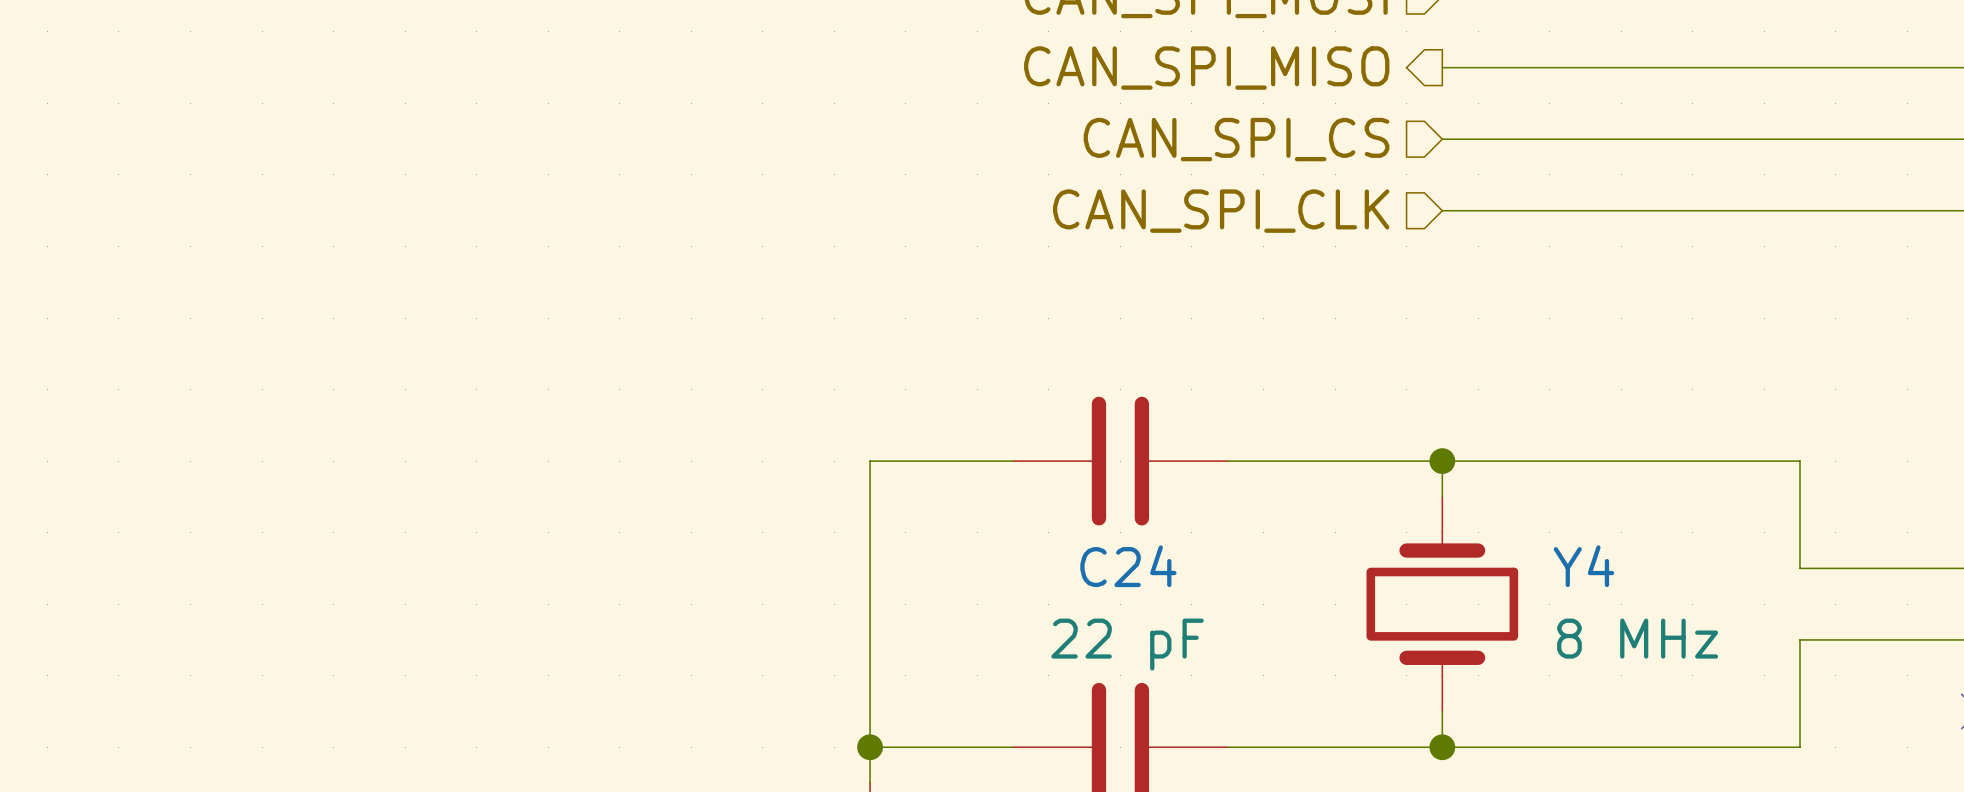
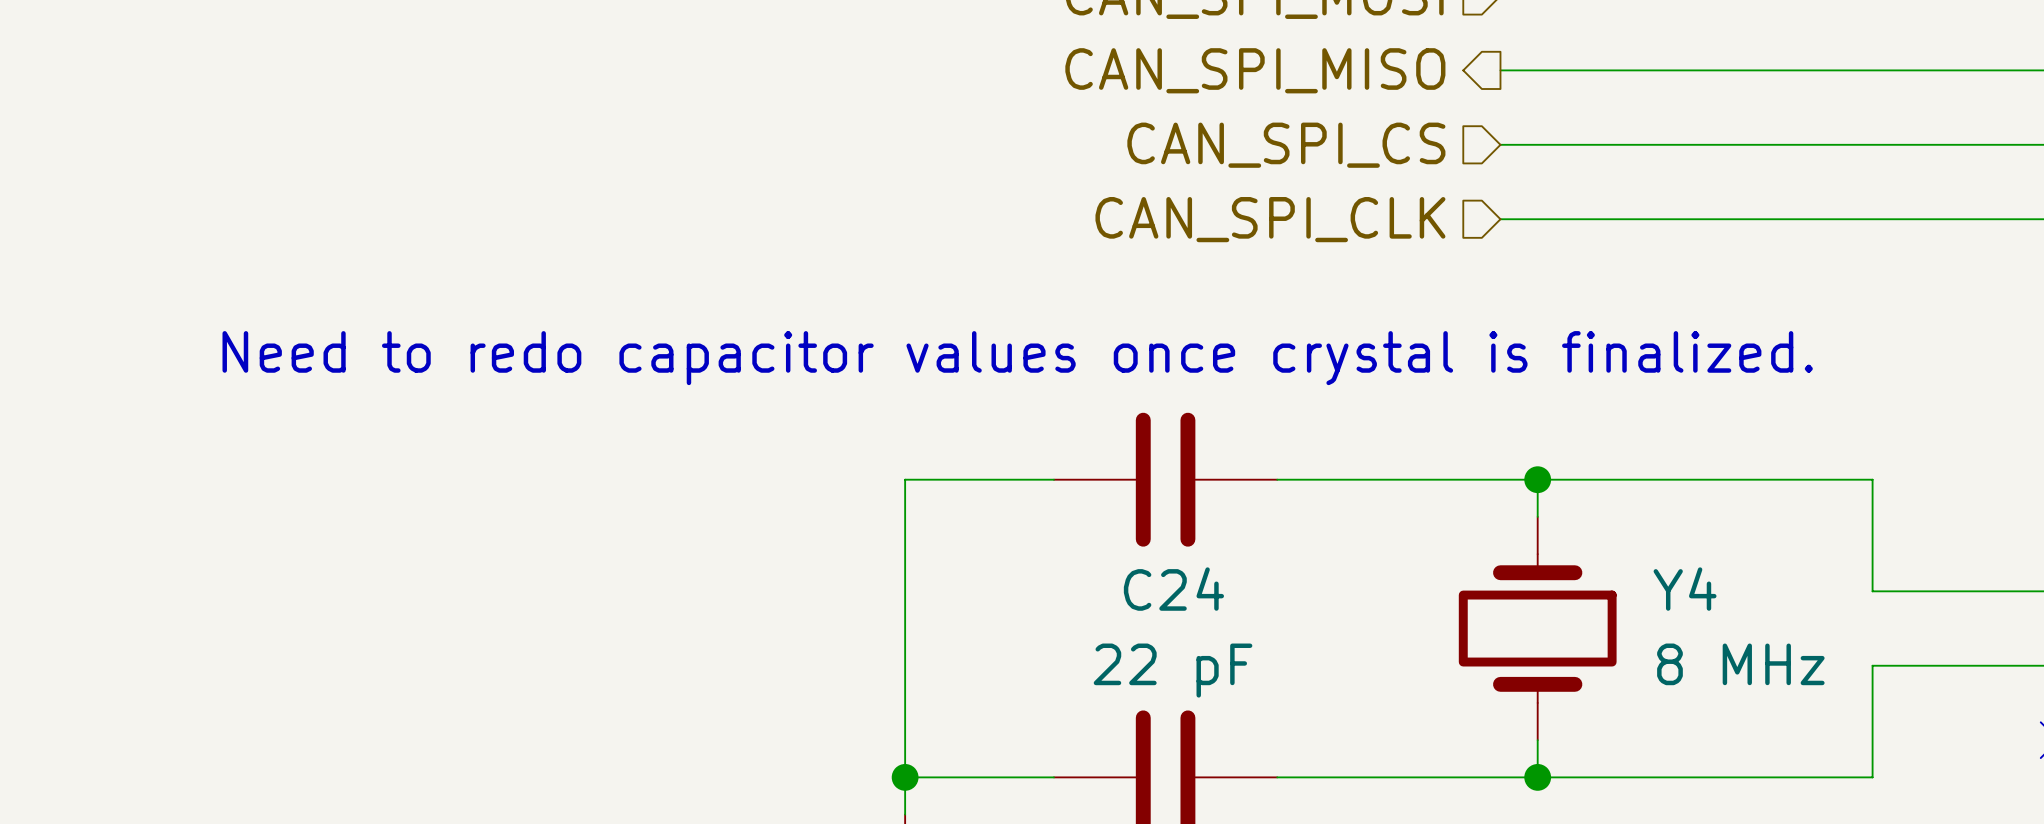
text: none -> Need to redo capacitor values once crystal is finalized. (1017, 358)
wire: (1442, 461) (1442, 496) -> (1537, 479) (1537, 516)
junction position: (1442, 461) -> (1537, 479)
Y4 position: (1442, 604) -> (1537, 628)
wire: (1442, 711) (1442, 747) -> (1537, 740) (1537, 777)
junction position: (1442, 747) -> (1537, 777)

